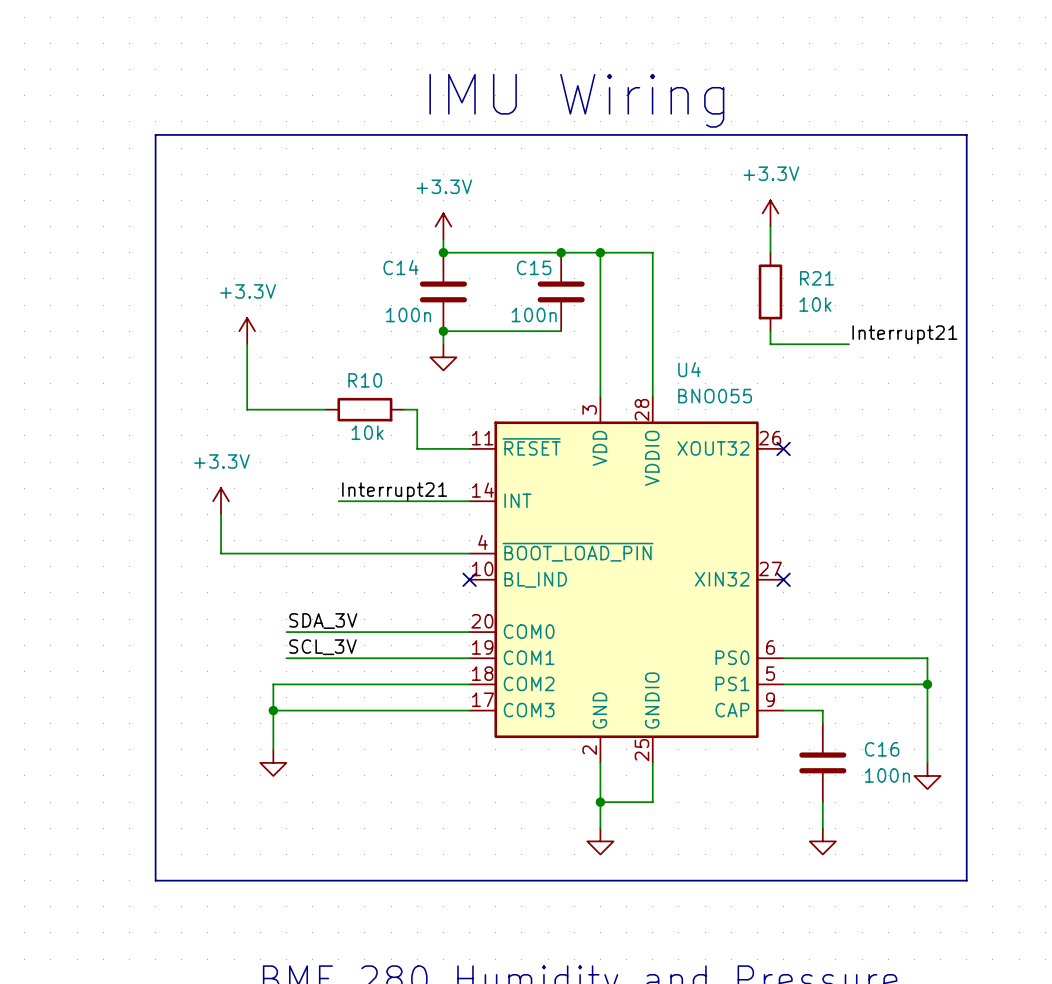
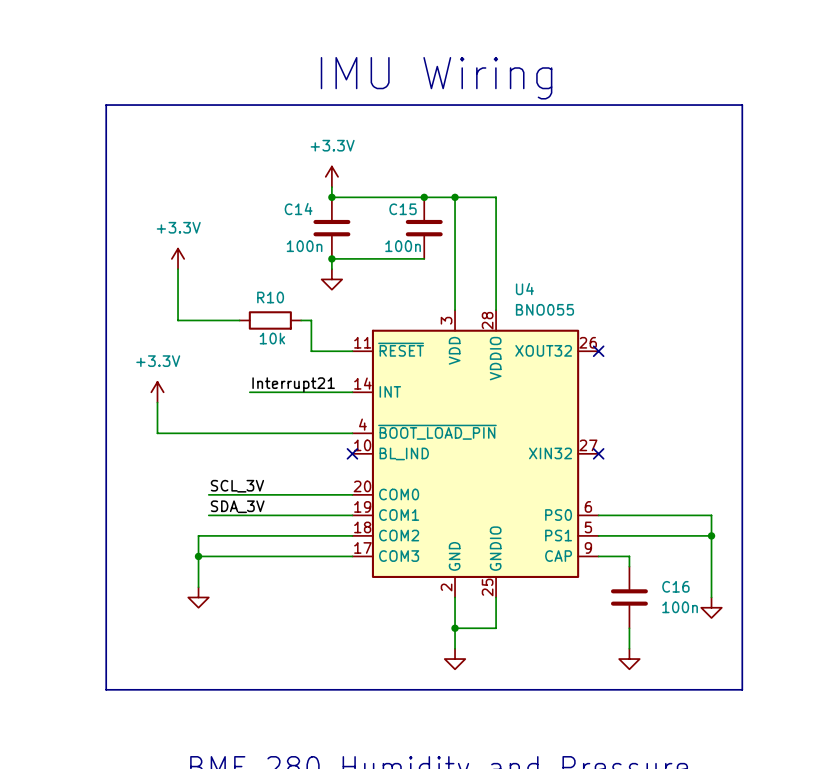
power symbol: +3.3V (770, 213) -> none
wire: (770, 226) (770, 252) -> none
R21: 10k (770, 291) -> none
wire: (770, 331) (770, 344) (848, 344) -> none
label: Interrupt21 (904, 334) -> none
label: SDA_3V (323, 621) -> SCL_3V (237, 486)
label: SCL_3V (322, 647) -> SDA_3V (237, 506)

